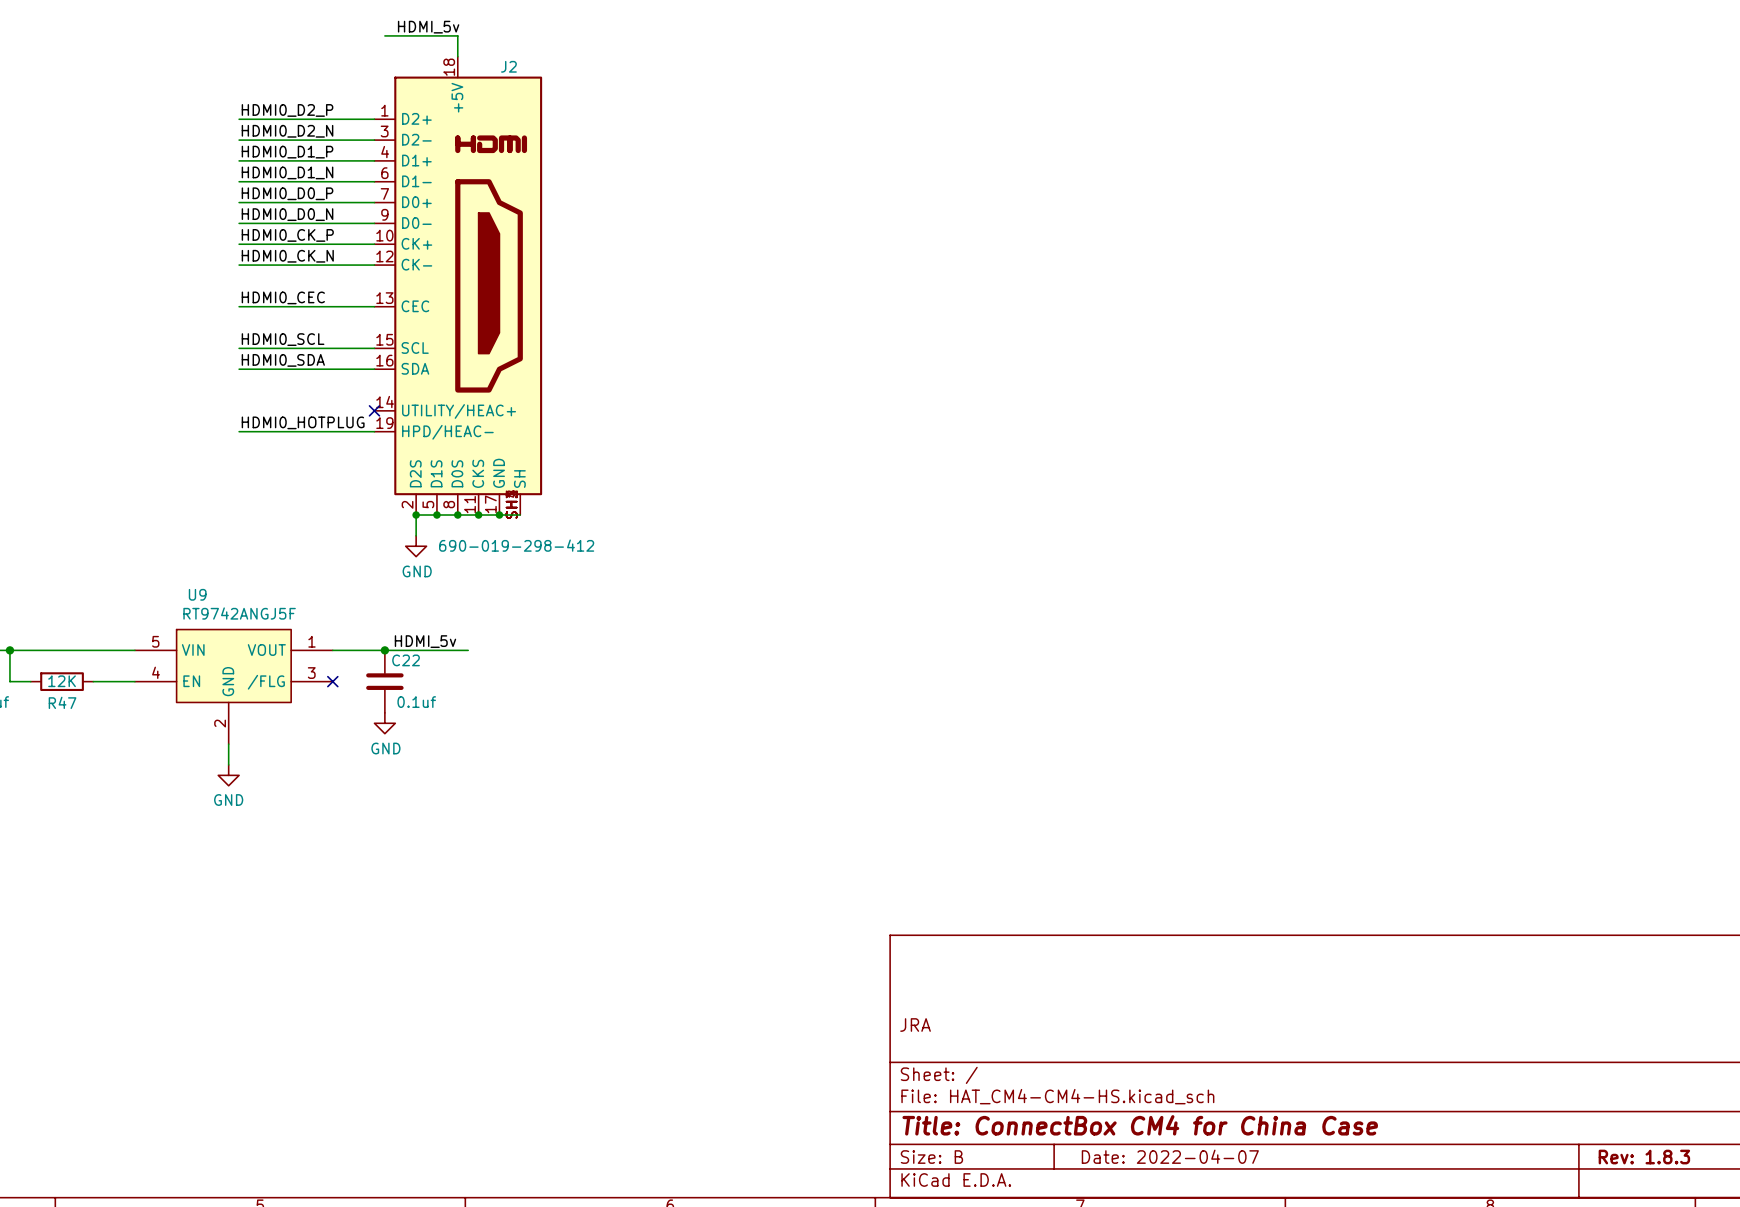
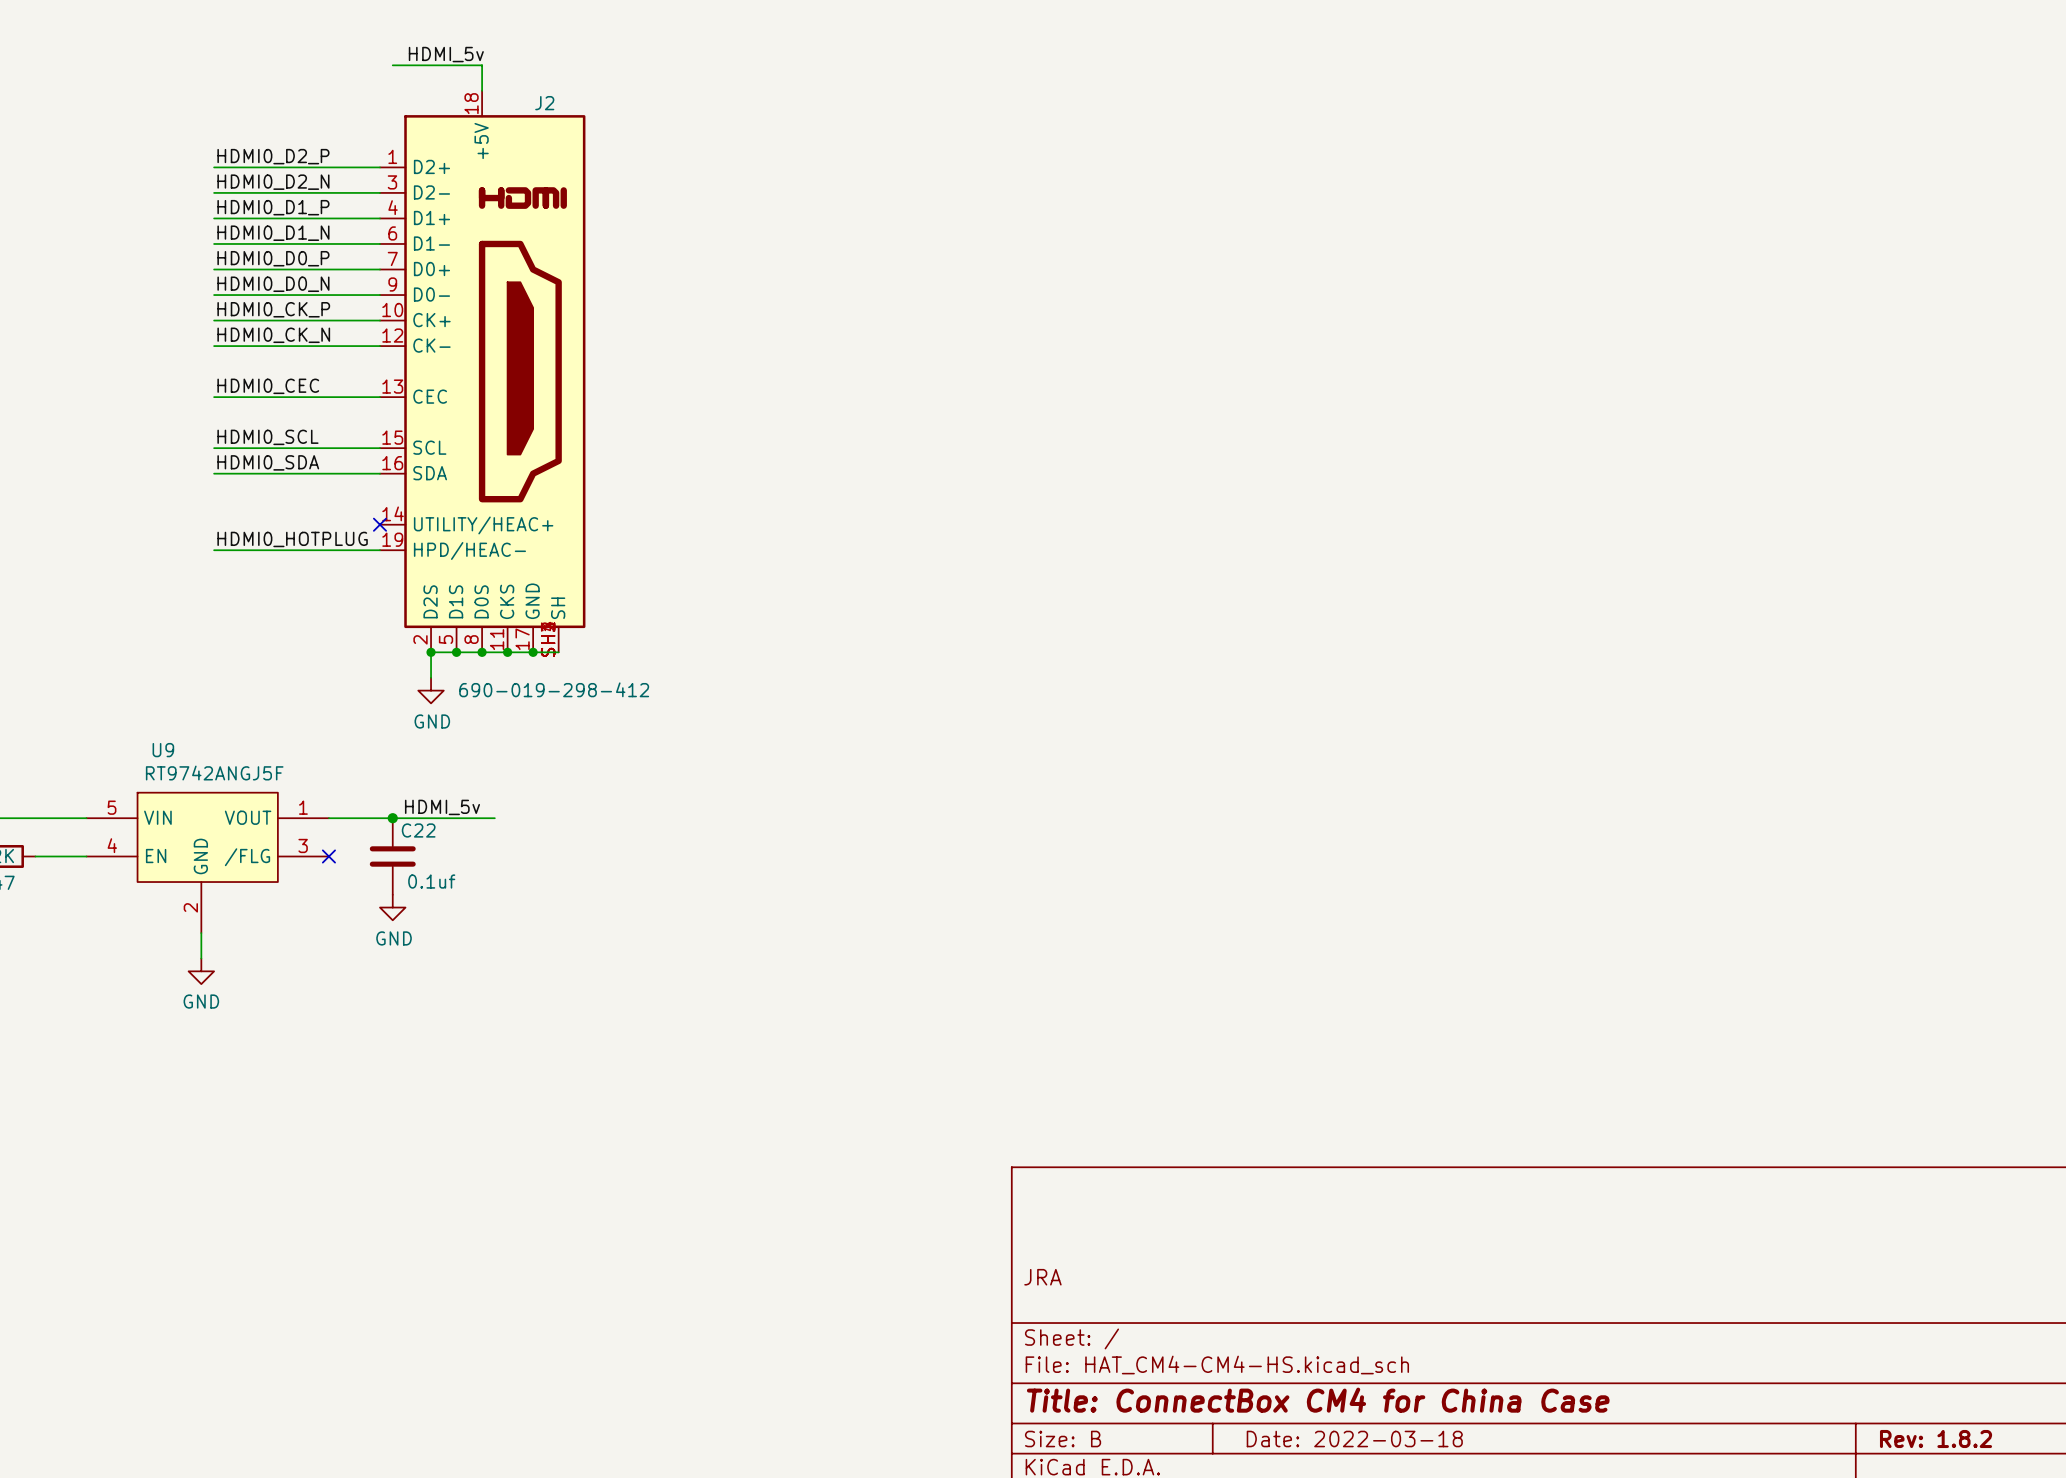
title block: Date: 2022-04-07 (1170, 1156) -> Date: 2022-03-18 (1354, 1439)
title block: Rev: 1.8.3 (1644, 1157) -> Rev: 1.8.2 (1936, 1439)

